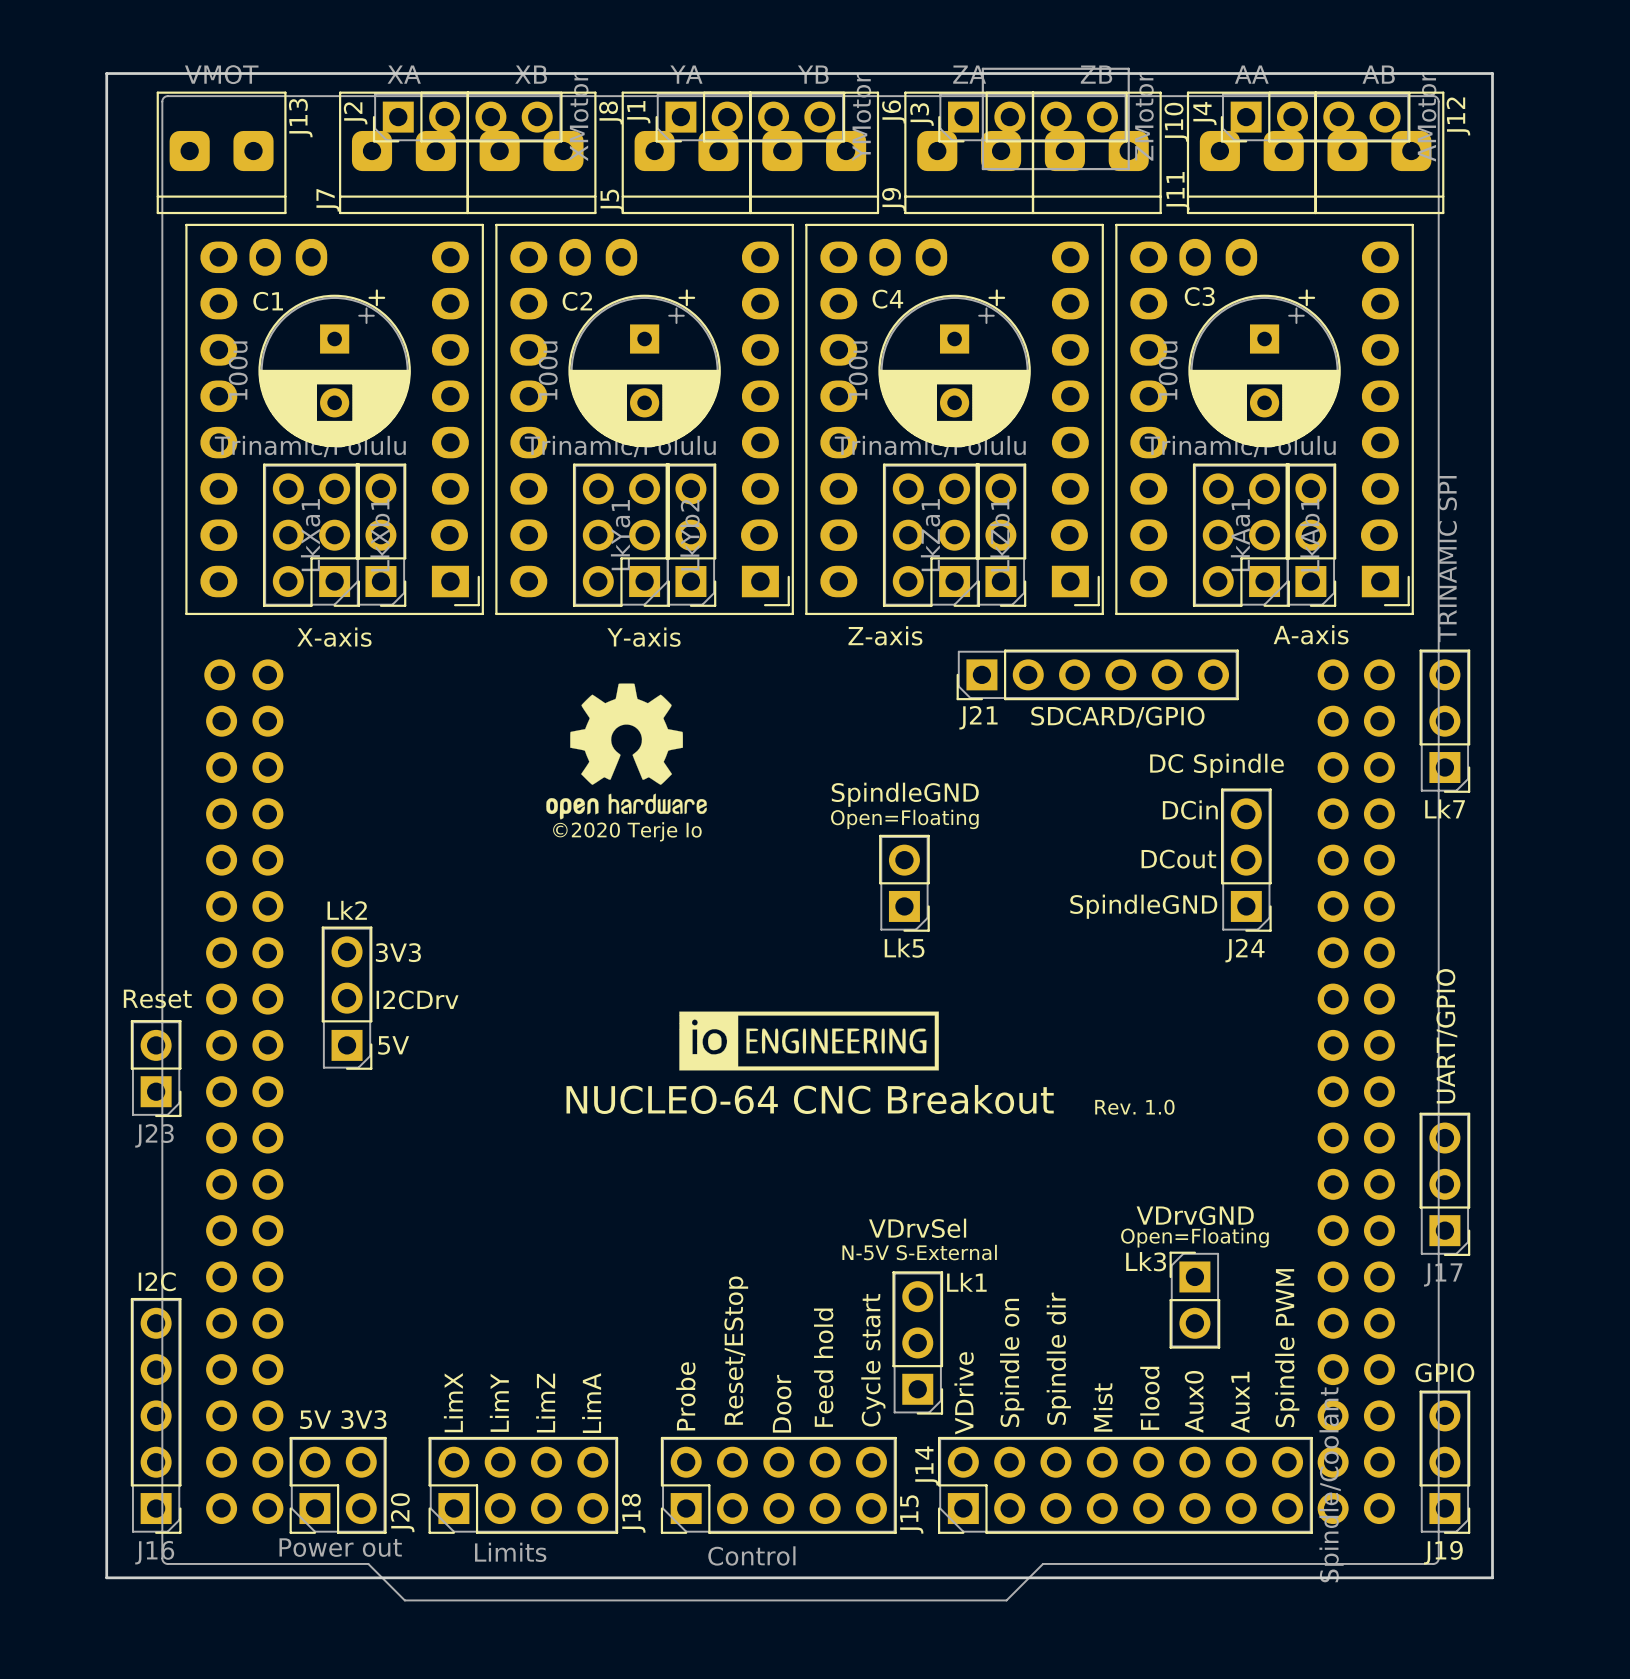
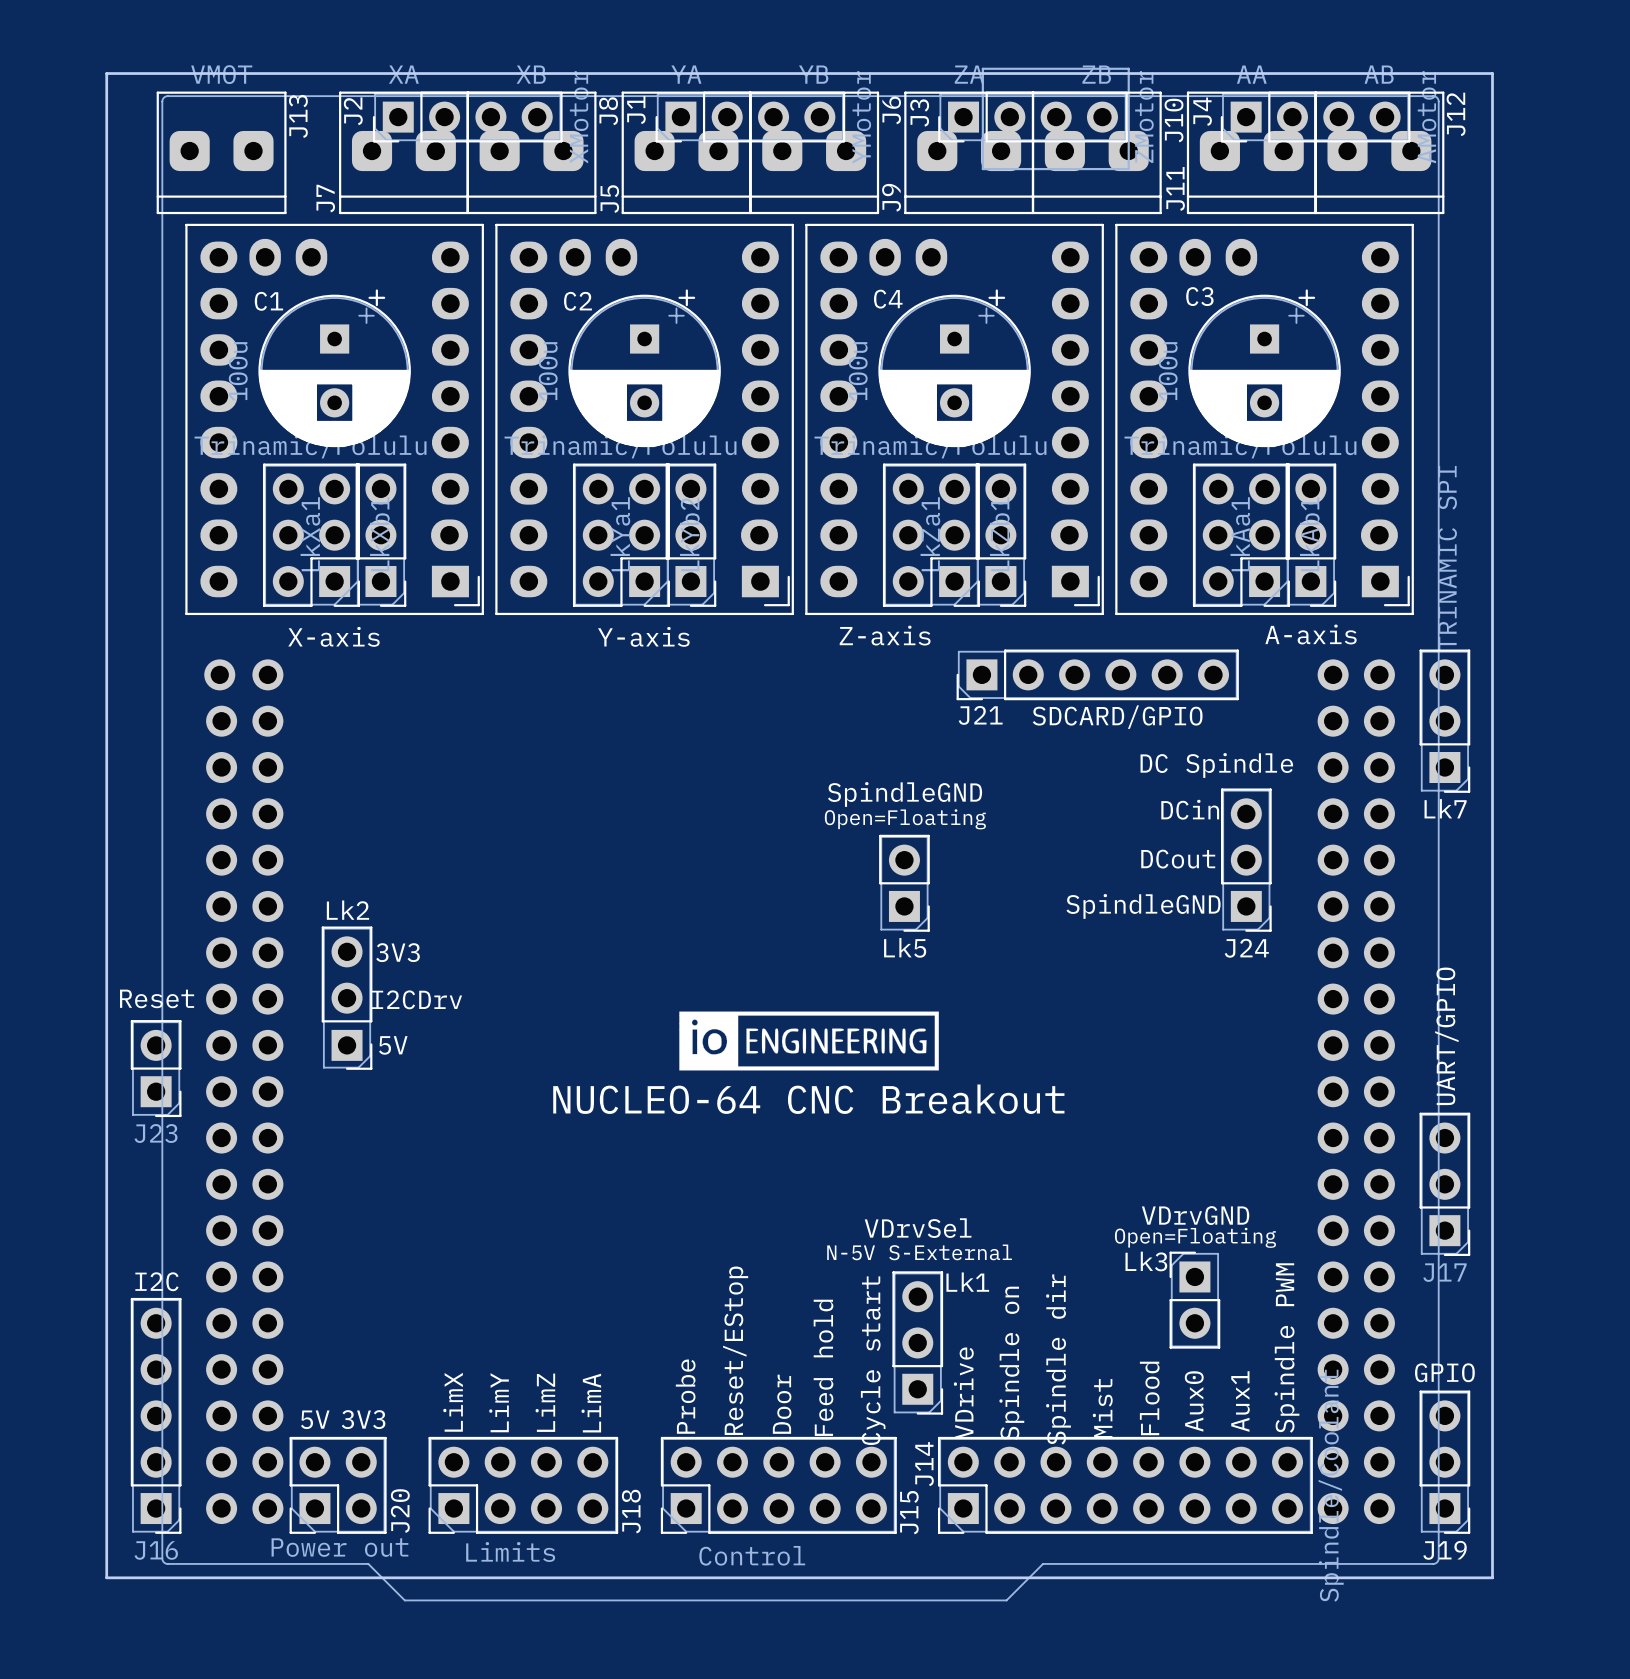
drawing: [546, 683, 707, 820] -> none
text: ©2020 Terje Io (627, 831) -> none
text: Rev. 1.0 (1134, 1107) -> none

